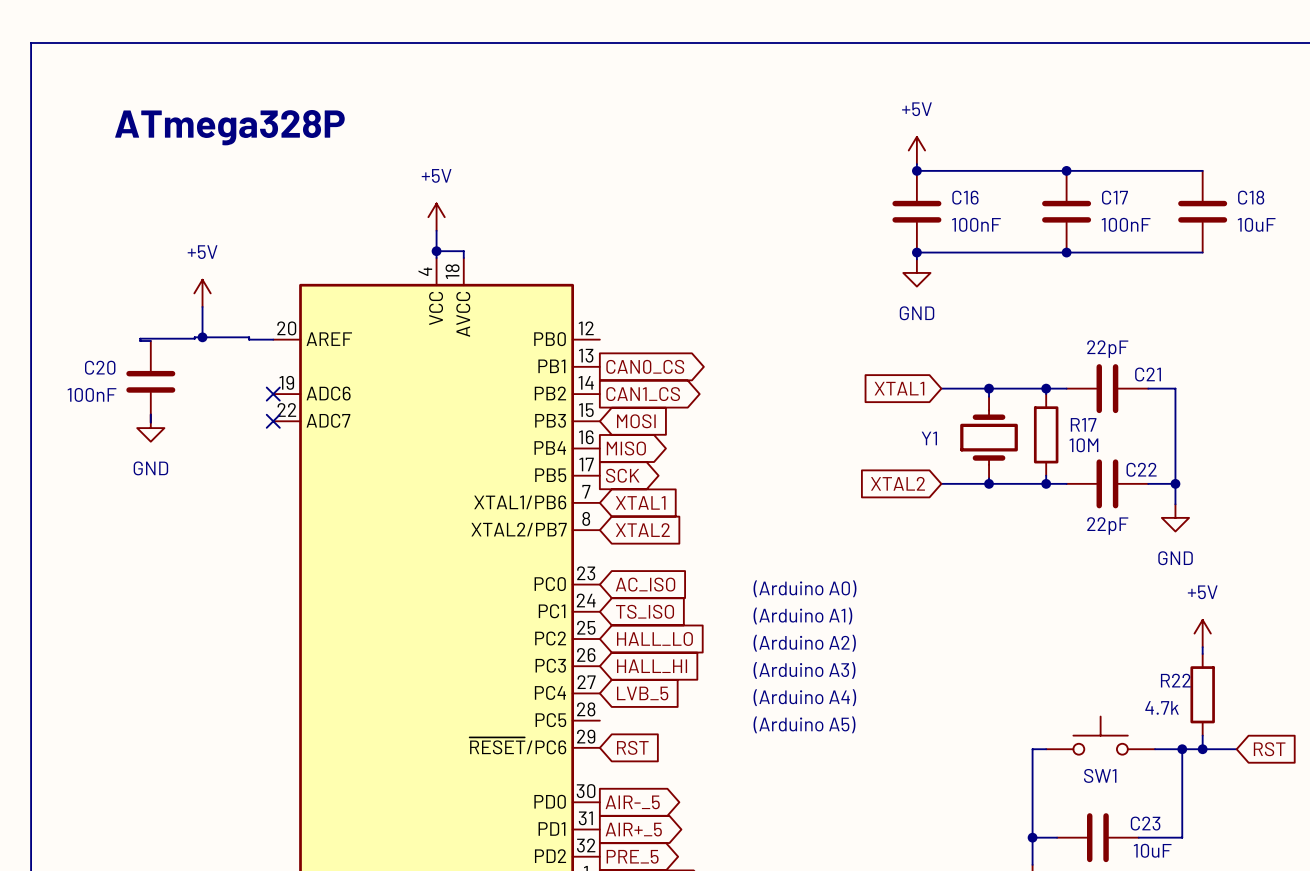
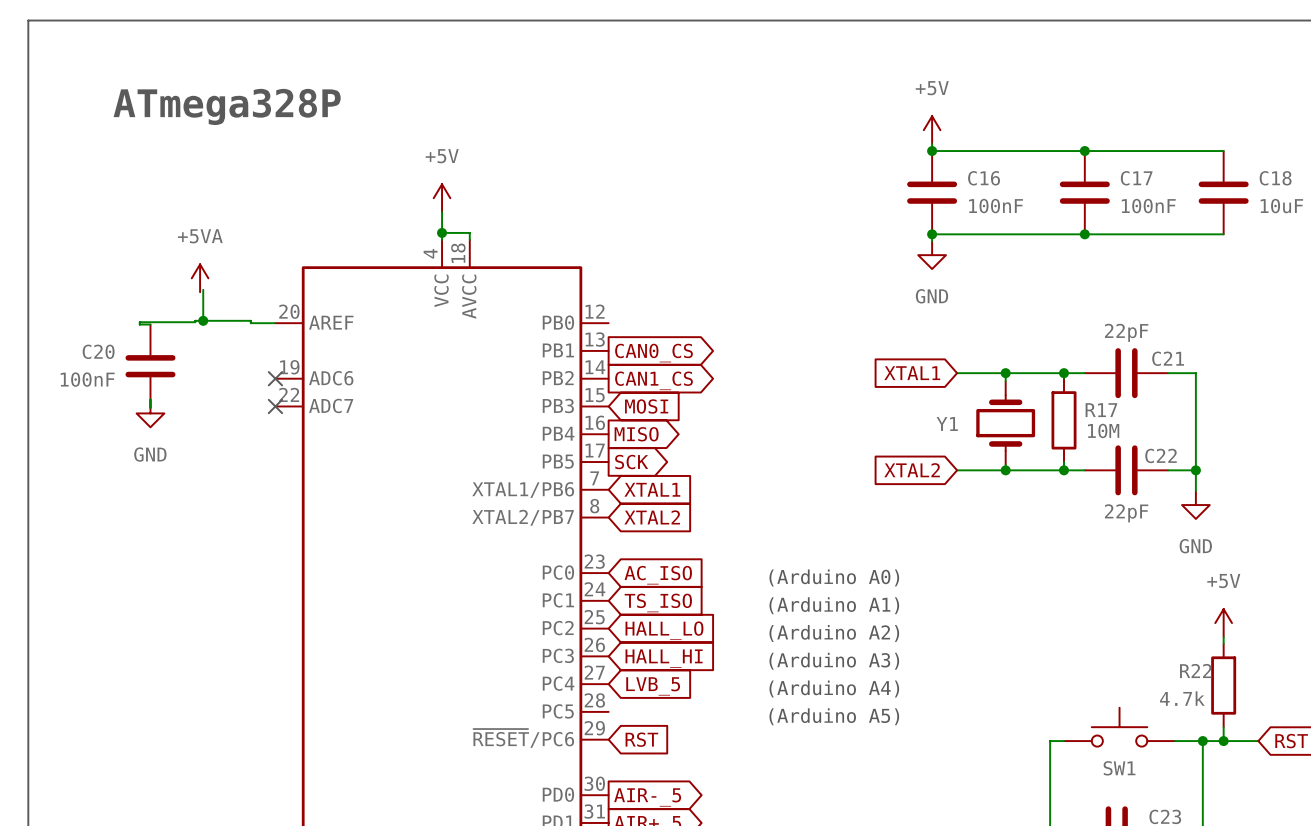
power symbol: +5V (202, 293) -> +5VA (200, 278)

